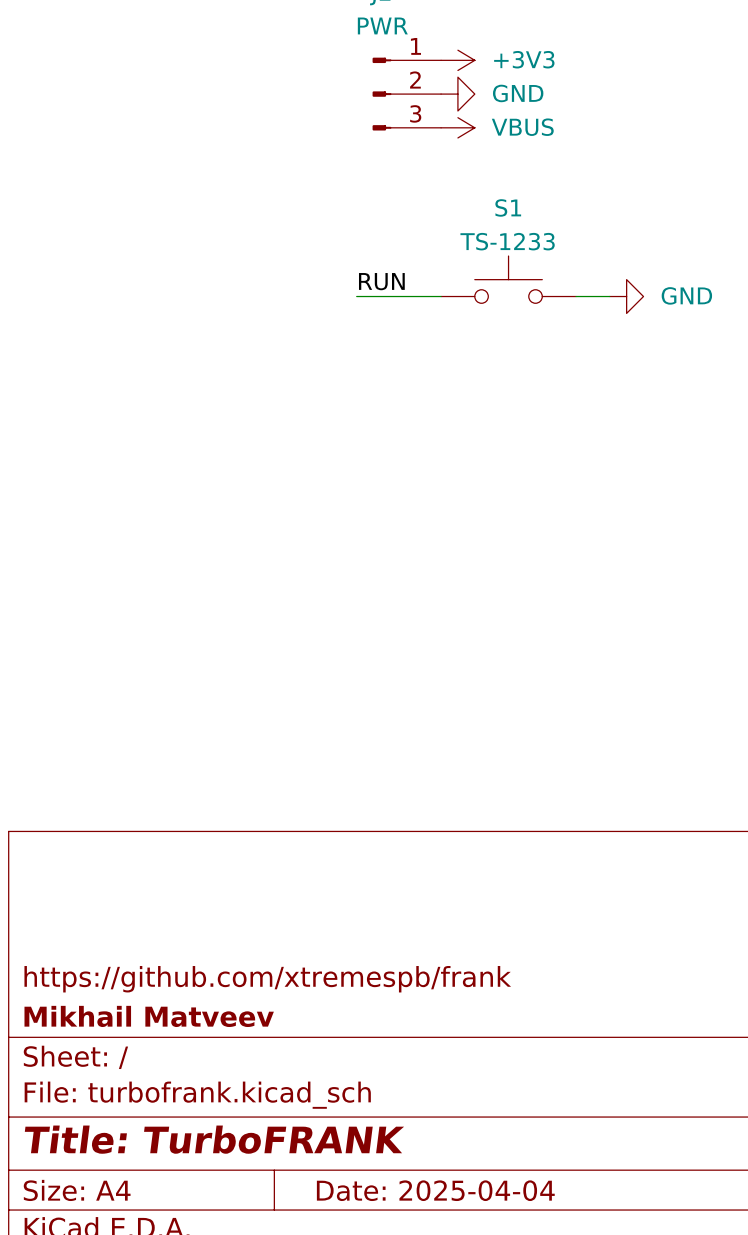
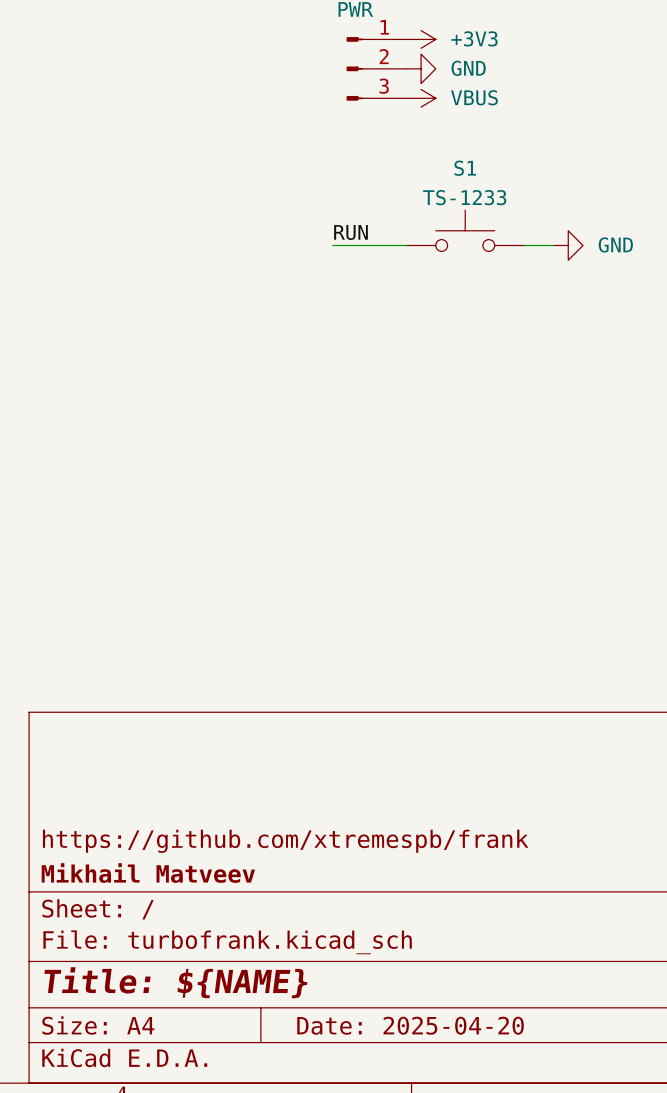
title block: Title: TurboFRANK (214, 1139) -> Title: ${NAME} (175, 982)
title block: Date: 2025-04-04 (435, 1190) -> Date: 2025-04-20 (410, 1025)

